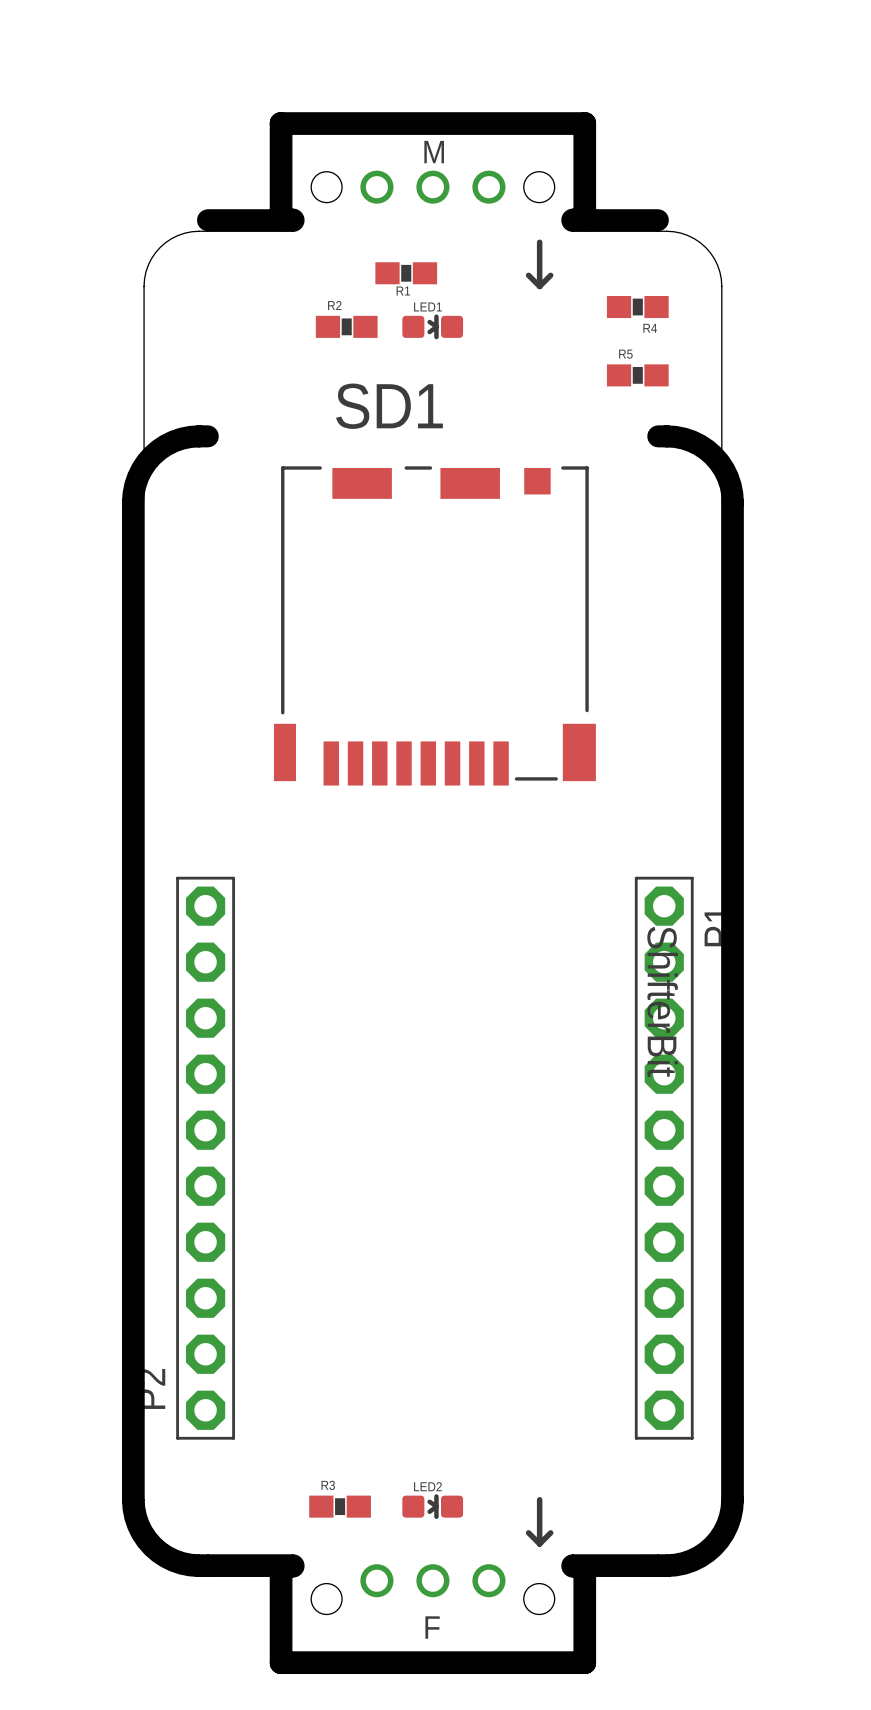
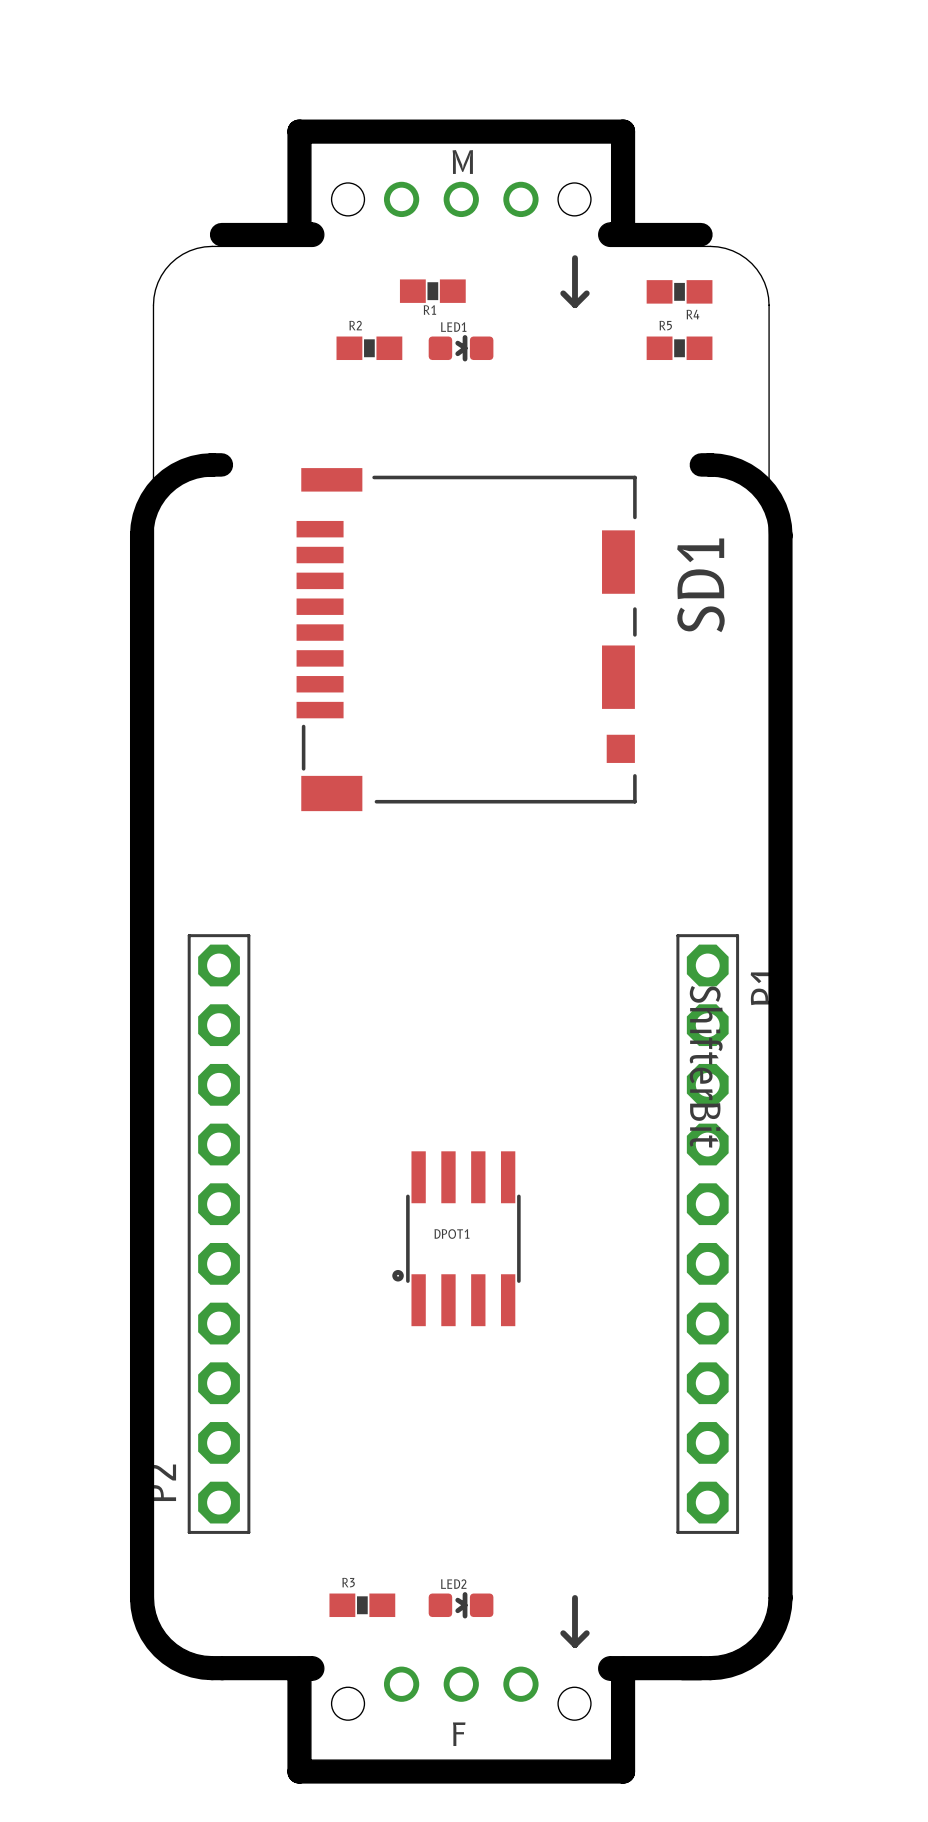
R4 position: (637, 307) -> (679, 291)
R5 position: (637, 375) -> (679, 348)
SD1 rotation: 0° (434, 625) -> 90° clockwise (466, 639)
DPOT1: none -> (456, 1238)

